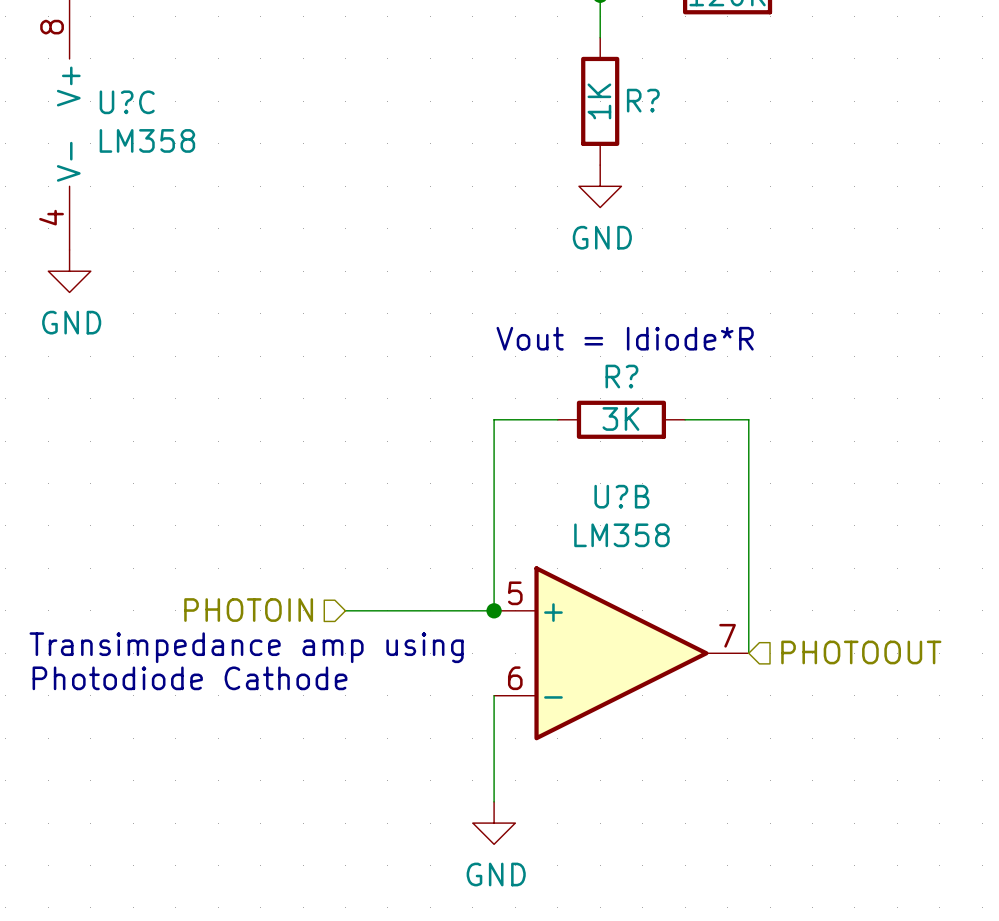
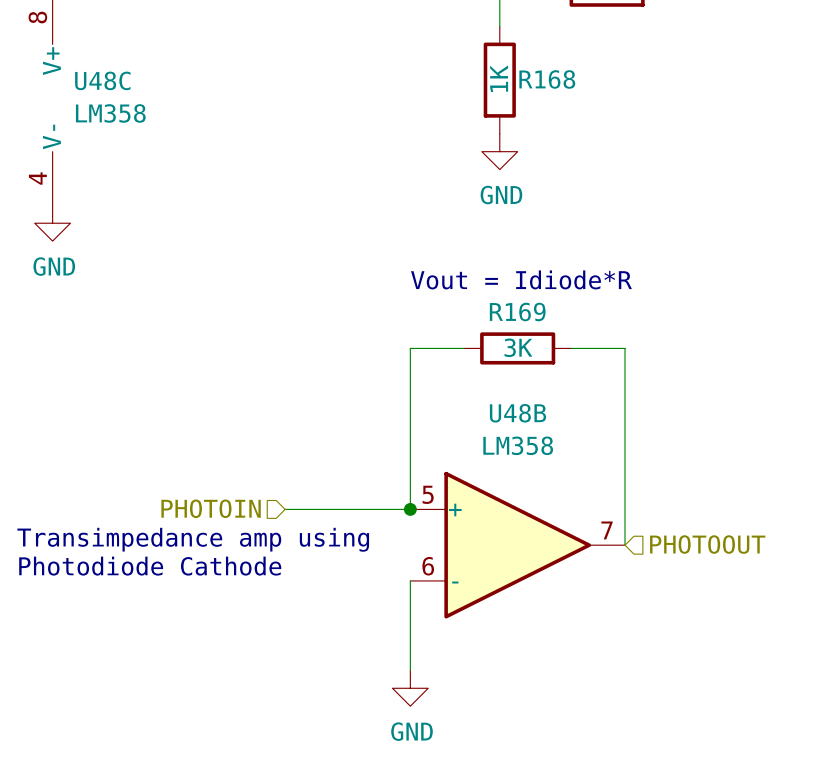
R? name: R? (643, 100) -> R168 (547, 79)
U?C name: U?C (127, 102) -> U48C (102, 80)
R? name: R? (621, 376) -> R169 (517, 312)
U?B name: U?B (621, 496) -> U48B (517, 413)

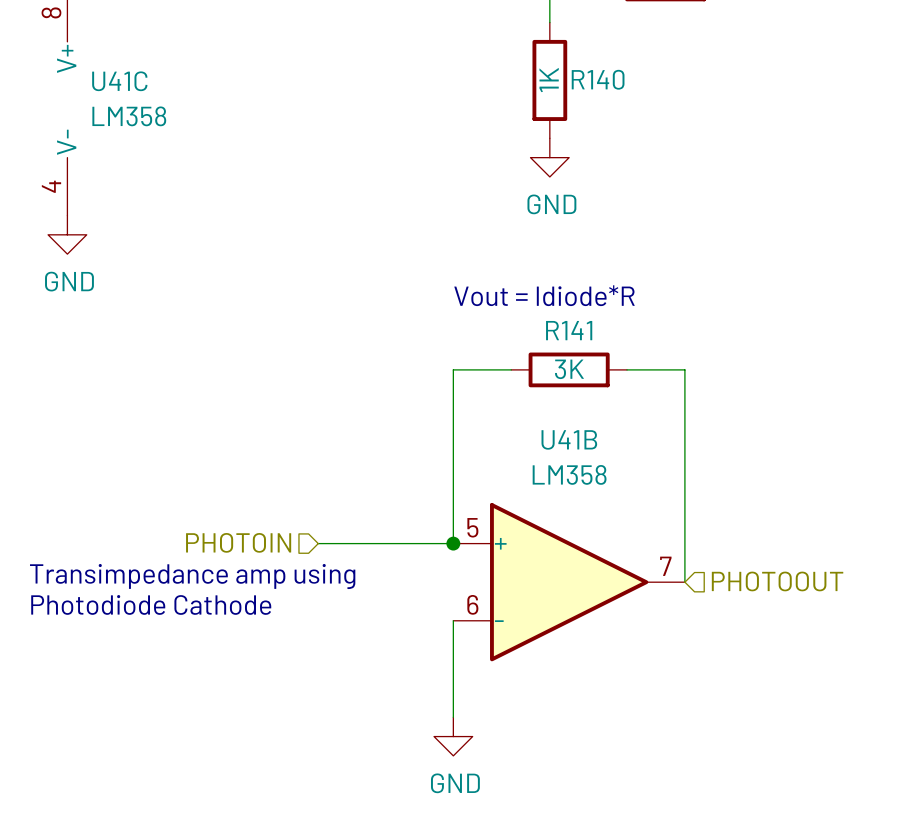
R168 name: R168 (547, 79) -> R140 (598, 79)
U48C name: U48C (102, 80) -> U41C (119, 81)
R169 name: R169 (517, 312) -> R141 (569, 330)
U48B name: U48B (517, 413) -> U41B (569, 439)

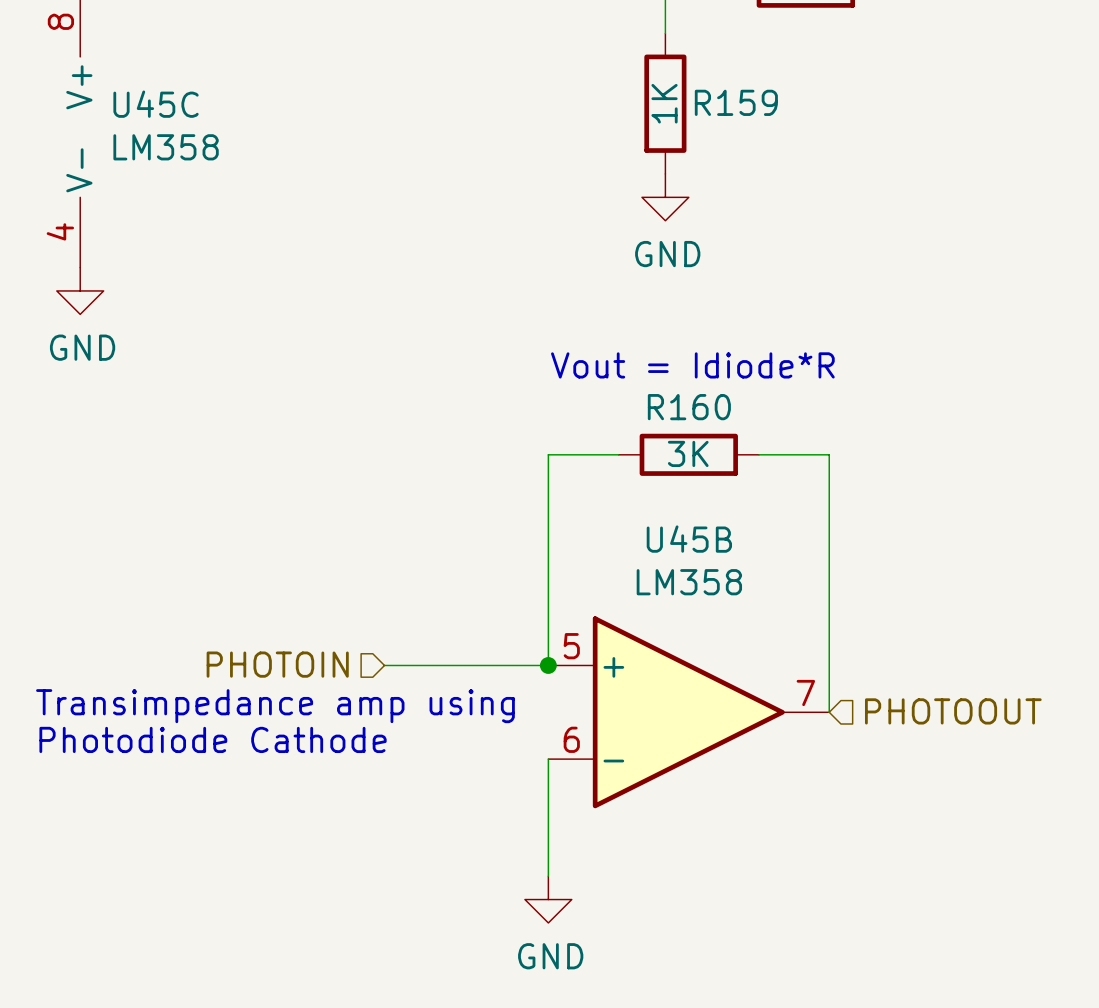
R140 name: R140 (598, 79) -> R159 (736, 102)
U41C name: U41C (119, 81) -> U45C (156, 104)
R141 name: R141 (569, 330) -> R160 (689, 407)
U41B name: U41B (569, 439) -> U45B (689, 539)

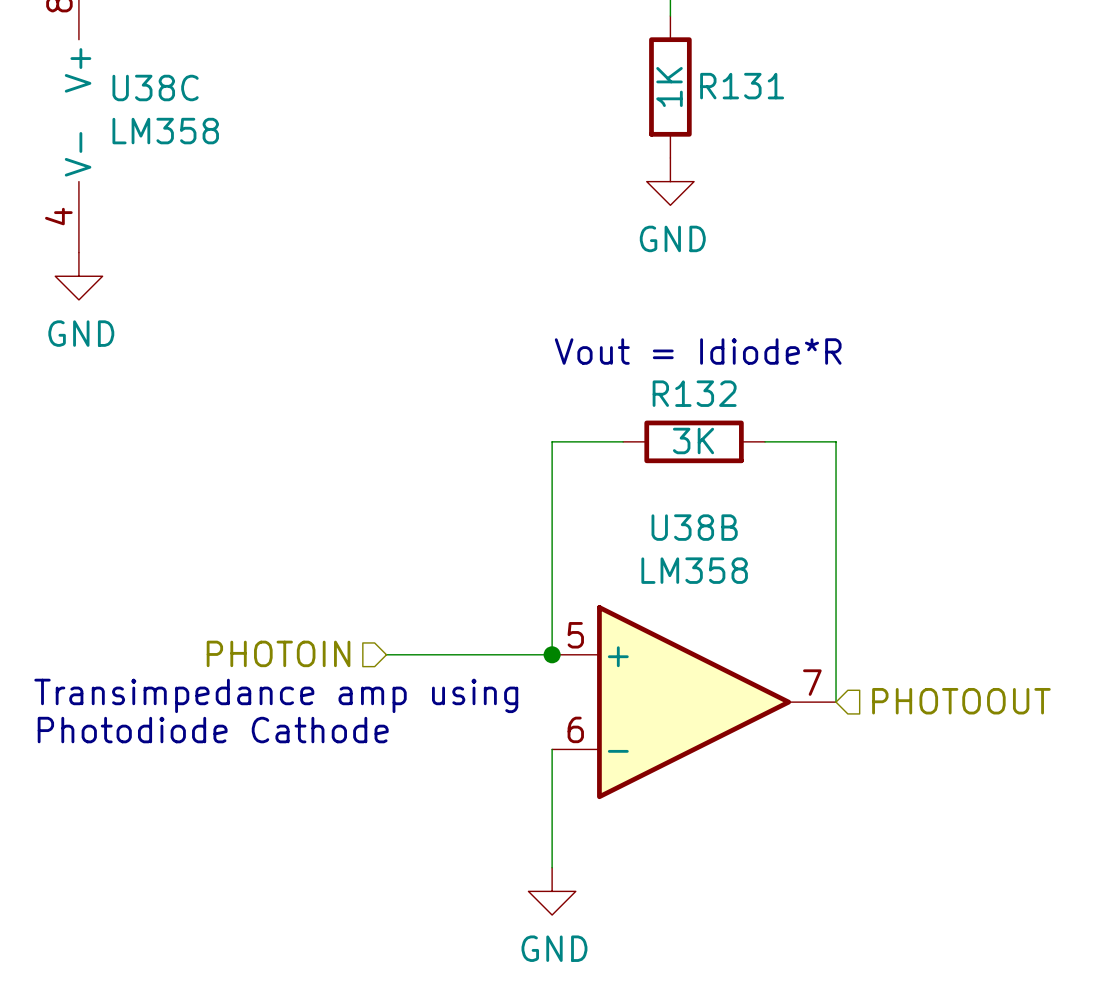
R159 name: R159 (736, 102) -> R131 (742, 86)
U45C name: U45C (156, 104) -> U38C (155, 88)
R160 name: R160 (689, 407) -> R132 (694, 393)
U45B name: U45B (689, 539) -> U38B (694, 527)

